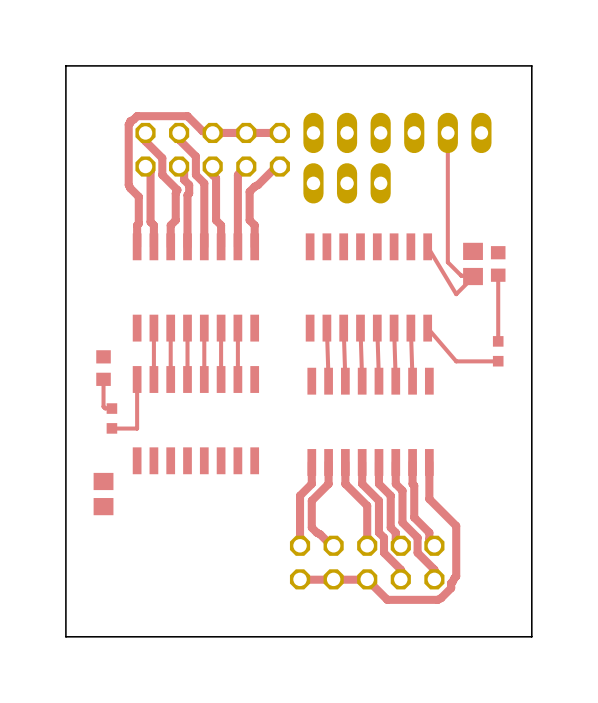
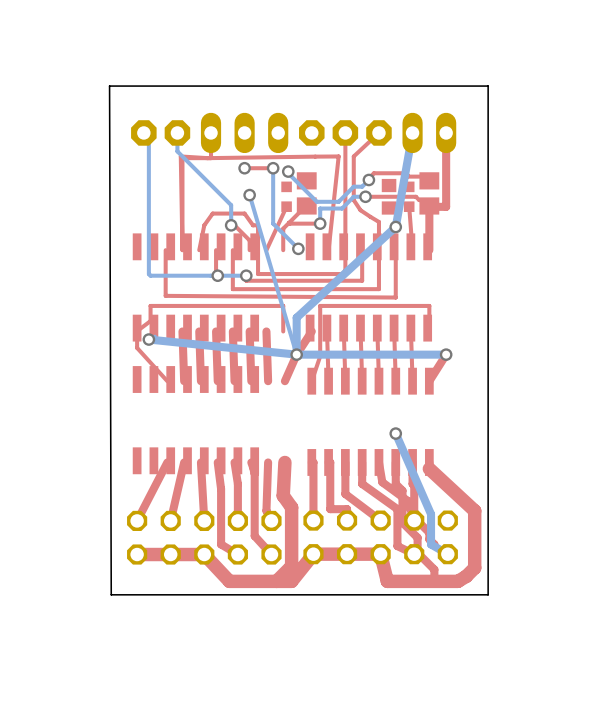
board edge: (531, 65) (65, 65) (65, 636) (531, 636) (531, 65) -> (488, 86) (488, 594) (111, 594) (109, 86) (488, 86)
bottom track: none -> (143, 132) (148, 137) (148, 274) (150, 275) (246, 275)
part: none -> (143, 132)
top track: (145, 132) (145, 141) (162, 158) (162, 174) (177, 190) (175, 220) (170, 225) (170, 246) -> none
bottom track: none -> (177, 132) (177, 151) (231, 205) (231, 225)
part: none -> (177, 132)
top track: (179, 132) (179, 139) (195, 156) (195, 174) (204, 183) (204, 246) -> none
top track: none -> (211, 132) (211, 158) (182, 158) (182, 250) (180, 156) (207, 158) (315, 156) (338, 156) (328, 250)
top track: (279, 132) (202, 131) (187, 116) (137, 116) (130, 121) (128, 124) (128, 185) (138, 196) (137, 246) -> none
part: none -> (311, 132)
top track: none -> (345, 132) (345, 270) (342, 274) (258, 274) (258, 225) (253, 225) (244, 213) (212, 213) (204, 225) (199, 250)
part: none -> (345, 132)
part: (363, 132) -> none
top track: none -> (378, 132) (353, 156) (353, 200) (360, 210) (378, 221) (378, 289) (232, 289) (232, 250)
part: none -> (378, 132)
bottom track: none -> (412, 132) (395, 227) (296, 317) (296, 354)
top track: none -> (446, 132) (446, 206) (429, 206)
top track: (447, 132) (447, 262) (461, 275) (473, 276) (456, 294) (427, 246) -> none
part position: (464, 132) -> (429, 132)
part: (212, 149) -> none
top track: (145, 166) (150, 171) (150, 221) (153, 225) (153, 246) -> none
top track: (179, 166) (184, 171) (184, 179) (189, 185) (187, 246) -> none
top track: (212, 166) (212, 174) (216, 178) (216, 220) (221, 225) (221, 246) -> none
top track: (246, 166) (237, 174) (237, 246) -> none
top track: (279, 166) (276, 166) (249, 191) (249, 220) (254, 225) (254, 246) -> none
via: none -> (244, 168)
top track: none -> (273, 168) (244, 168)
bottom track: none -> (273, 168) (273, 223) (298, 248)
via: none -> (273, 168)
bottom track: none -> (284, 169) (316, 201) (338, 201) (353, 186) (362, 186) (368, 179) (368, 181)
via: none -> (288, 171)
top track: none -> (368, 179) (373, 173) (405, 173) (407, 176) (422, 176) (429, 180)
via: none -> (368, 179)
part position: (347, 183) -> (244, 132)
part: none -> (306, 193)
bottom track: none -> (249, 195) (296, 354)
via: none -> (249, 195)
part: none -> (286, 196)
top track: none -> (365, 196) (415, 196) (419, 200) (424, 200) (429, 205) (429, 250)
bottom track: none -> (365, 196) (353, 196) (342, 208) (320, 208) (320, 223)
via: none -> (365, 196)
part: none -> (409, 196)
top track: none -> (306, 205) (300, 205) (300, 211) (283, 228) (283, 250)
top track: none -> (286, 206) (266, 250)
top track: none -> (409, 206) (412, 250)
top track: none -> (289, 222) (320, 223)
via: none -> (320, 223)
top track: none -> (231, 225) (234, 225) (249, 240) (249, 250)
via: none -> (231, 225)
via: none -> (395, 227)
via: none -> (298, 248)
top track: none -> (216, 250) (216, 274) (217, 275)
top track: none -> (362, 250) (362, 280) (246, 280) (246, 275)
top track: none -> (395, 250) (395, 297) (165, 295) (165, 250)
part position: (473, 263) -> (429, 193)
part position: (498, 263) -> (389, 196)
via: none -> (217, 275)
via: none -> (246, 275)
top track: (498, 275) (498, 339) (496, 341) (498, 342) (498, 341) -> none
top track: (153, 328) (153, 379) -> none
top track: (170, 328) (170, 379) -> none
top track: (187, 328) (187, 379) -> none
top track: (204, 328) (204, 379) -> none
top track: (221, 328) (221, 379) -> none
top track: (237, 328) (237, 379) -> none
top track: (427, 328) (456, 361) (498, 361) -> none
top track: none -> (182, 331) (184, 381)
top track: none -> (199, 331) (200, 381)
top track: none -> (216, 331) (217, 381)
top track: none -> (232, 331) (234, 381)
top track: none -> (249, 331) (251, 381)
top track: none -> (266, 331) (268, 381)
top track: none -> (283, 331) (283, 305) (150, 305) (150, 321) (137, 331) (137, 347) (167, 381)
top track: none -> (311, 331) (296, 354) (284, 381)
top track: none -> (429, 331) (429, 305) (320, 305) (320, 356) (311, 381)
bottom track: none -> (154, 336) (148, 339) (296, 354)
via: none -> (148, 339)
part: (498, 351) -> none
via: none -> (296, 354)
top track: none -> (446, 354) (429, 381)
bottom track: none -> (446, 354) (296, 354)
via: none -> (446, 354)
part: (103, 368) -> none
top track: (103, 379) (103, 406) (111, 408) -> none
top track: (137, 379) (137, 428) (111, 428) -> none
part: (111, 418) -> none
bottom track: none -> (395, 433) (431, 514) (431, 544) (447, 554)
via: none -> (395, 433)
top track: none -> (167, 462) (137, 520)
top track: none -> (184, 462) (170, 520)
top track: none -> (200, 462) (204, 520)
top track: none -> (217, 462) (221, 489) (221, 544) (237, 554)
top track: none -> (234, 462) (237, 483) (237, 520)
top track: none -> (251, 462) (254, 473) (254, 536) (271, 554)
top track: none -> (268, 462) (266, 510) (271, 520)
top track: none -> (284, 462) (283, 495) (291, 507) (291, 566) (276, 581)
top track: (311, 462) (311, 483) (300, 495) (300, 545) -> (311, 462) (313, 462) (313, 520)
top track: (328, 462) (328, 483) (311, 500) (311, 527) (333, 545) -> (328, 462) (330, 462) (330, 509) (347, 509) (347, 520)
top track: (378, 462) (378, 483) (390, 495) (390, 527) (395, 532) (395, 539) (400, 545) -> (378, 462) (382, 482) (407, 500) (414, 520)
top track: (429, 468) (429, 499) (456, 525) (456, 576) (451, 583) (451, 588) (441, 598) (437, 599) (387, 599) (367, 579) (300, 579) -> (429, 468) (474, 510) (474, 567) (457, 581) (387, 581) (380, 554) (313, 554) (291, 581) (229, 581) (204, 554) (137, 554)
top track: (345, 483) (367, 505) (367, 545) -> (345, 483) (345, 494) (380, 520)
top track: (362, 483) (378, 500) (378, 532) (384, 537) (384, 552) (400, 569) (400, 579) -> (362, 483) (397, 509) (397, 546) (414, 554)
part: (103, 494) -> none
part: none -> (204, 537)
part position: (367, 562) -> (380, 537)

